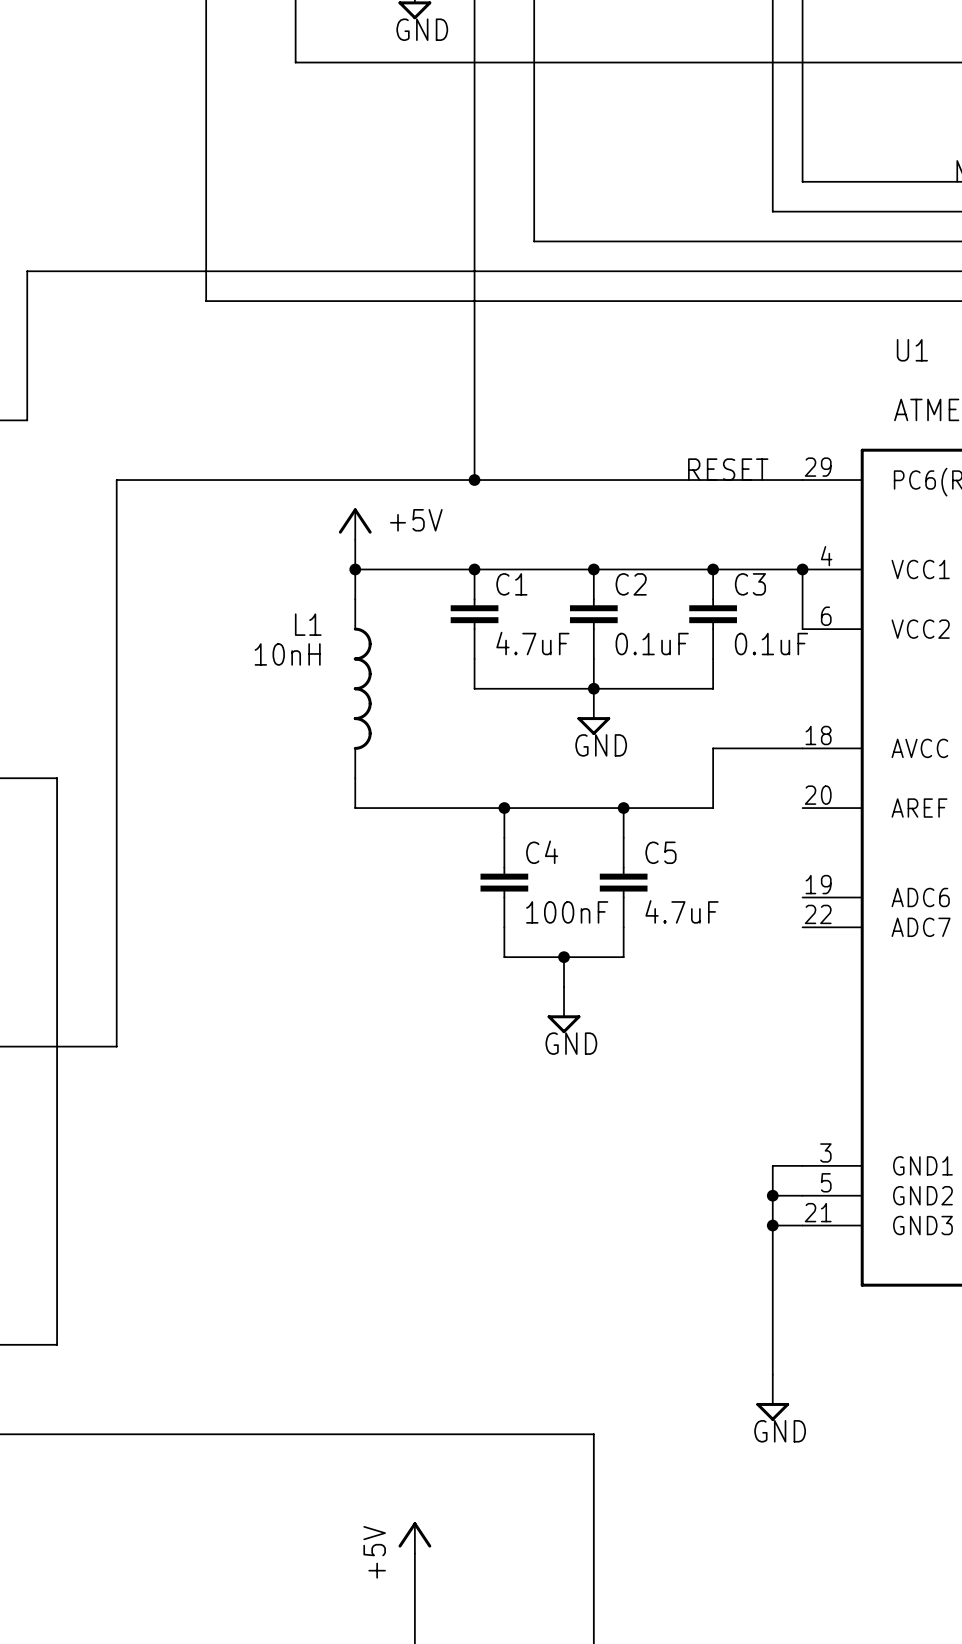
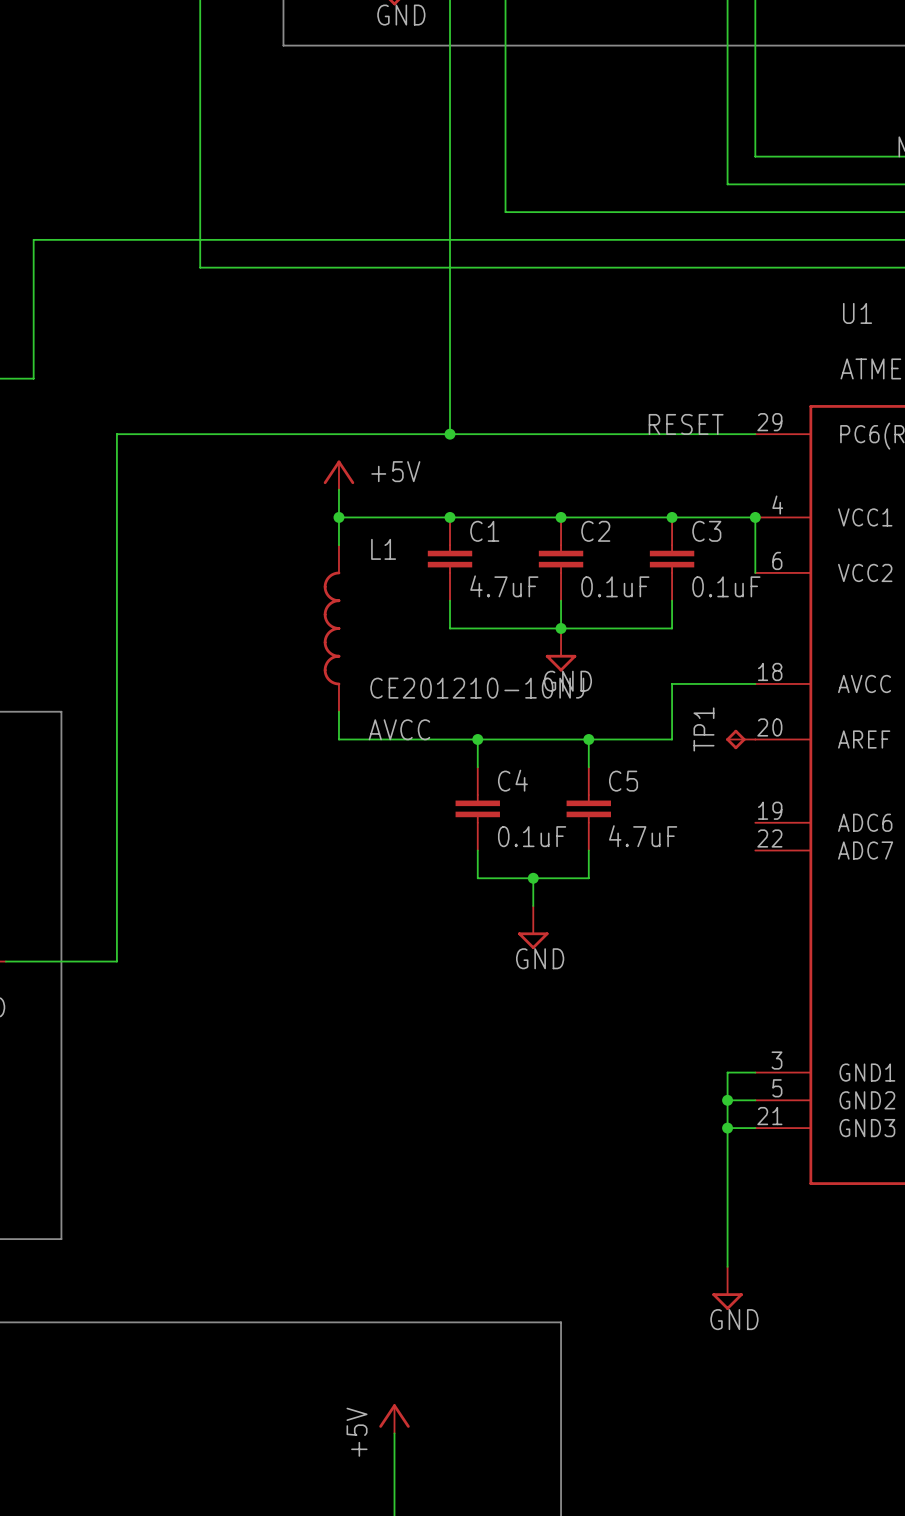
L1 name position: L1 (308, 624) -> L1 (383, 549)
L1 value: 10nH (287, 654) -> CE201210-10NJ (477, 688)
L1 rotation: 0° (362, 688) -> 180° (332, 628)
label: none -> AVCC (399, 729)
TP1: none -> (740, 739)
C4 value: 100nF (567, 912) -> 0.1uF (532, 836)

